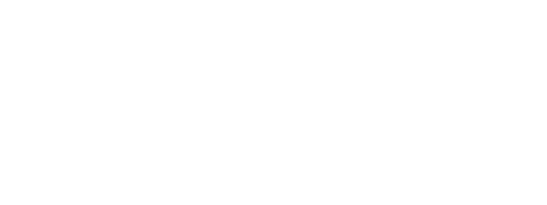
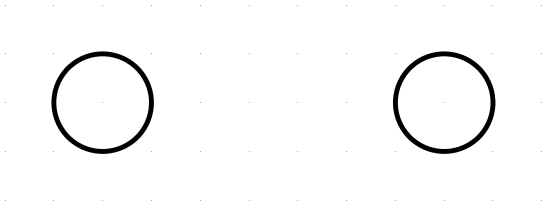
part: none -> (102, 102)
part: none -> (444, 102)

